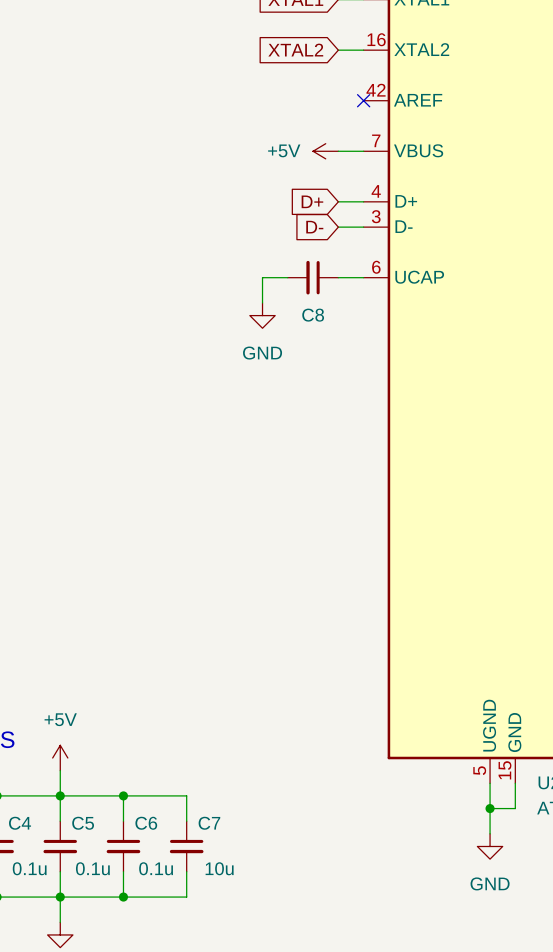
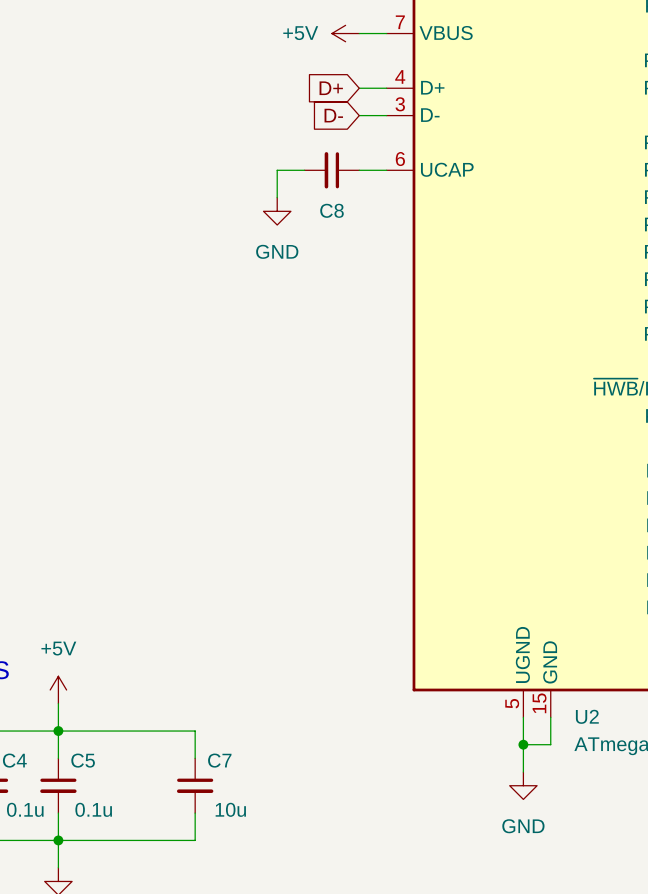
wire: (123, 795) (123, 821) -> none
junction: (123, 795) -> none
C6: 0.1u (123, 846) -> none
wire: (123, 871) (123, 897) -> none
junction: (123, 897) -> none

